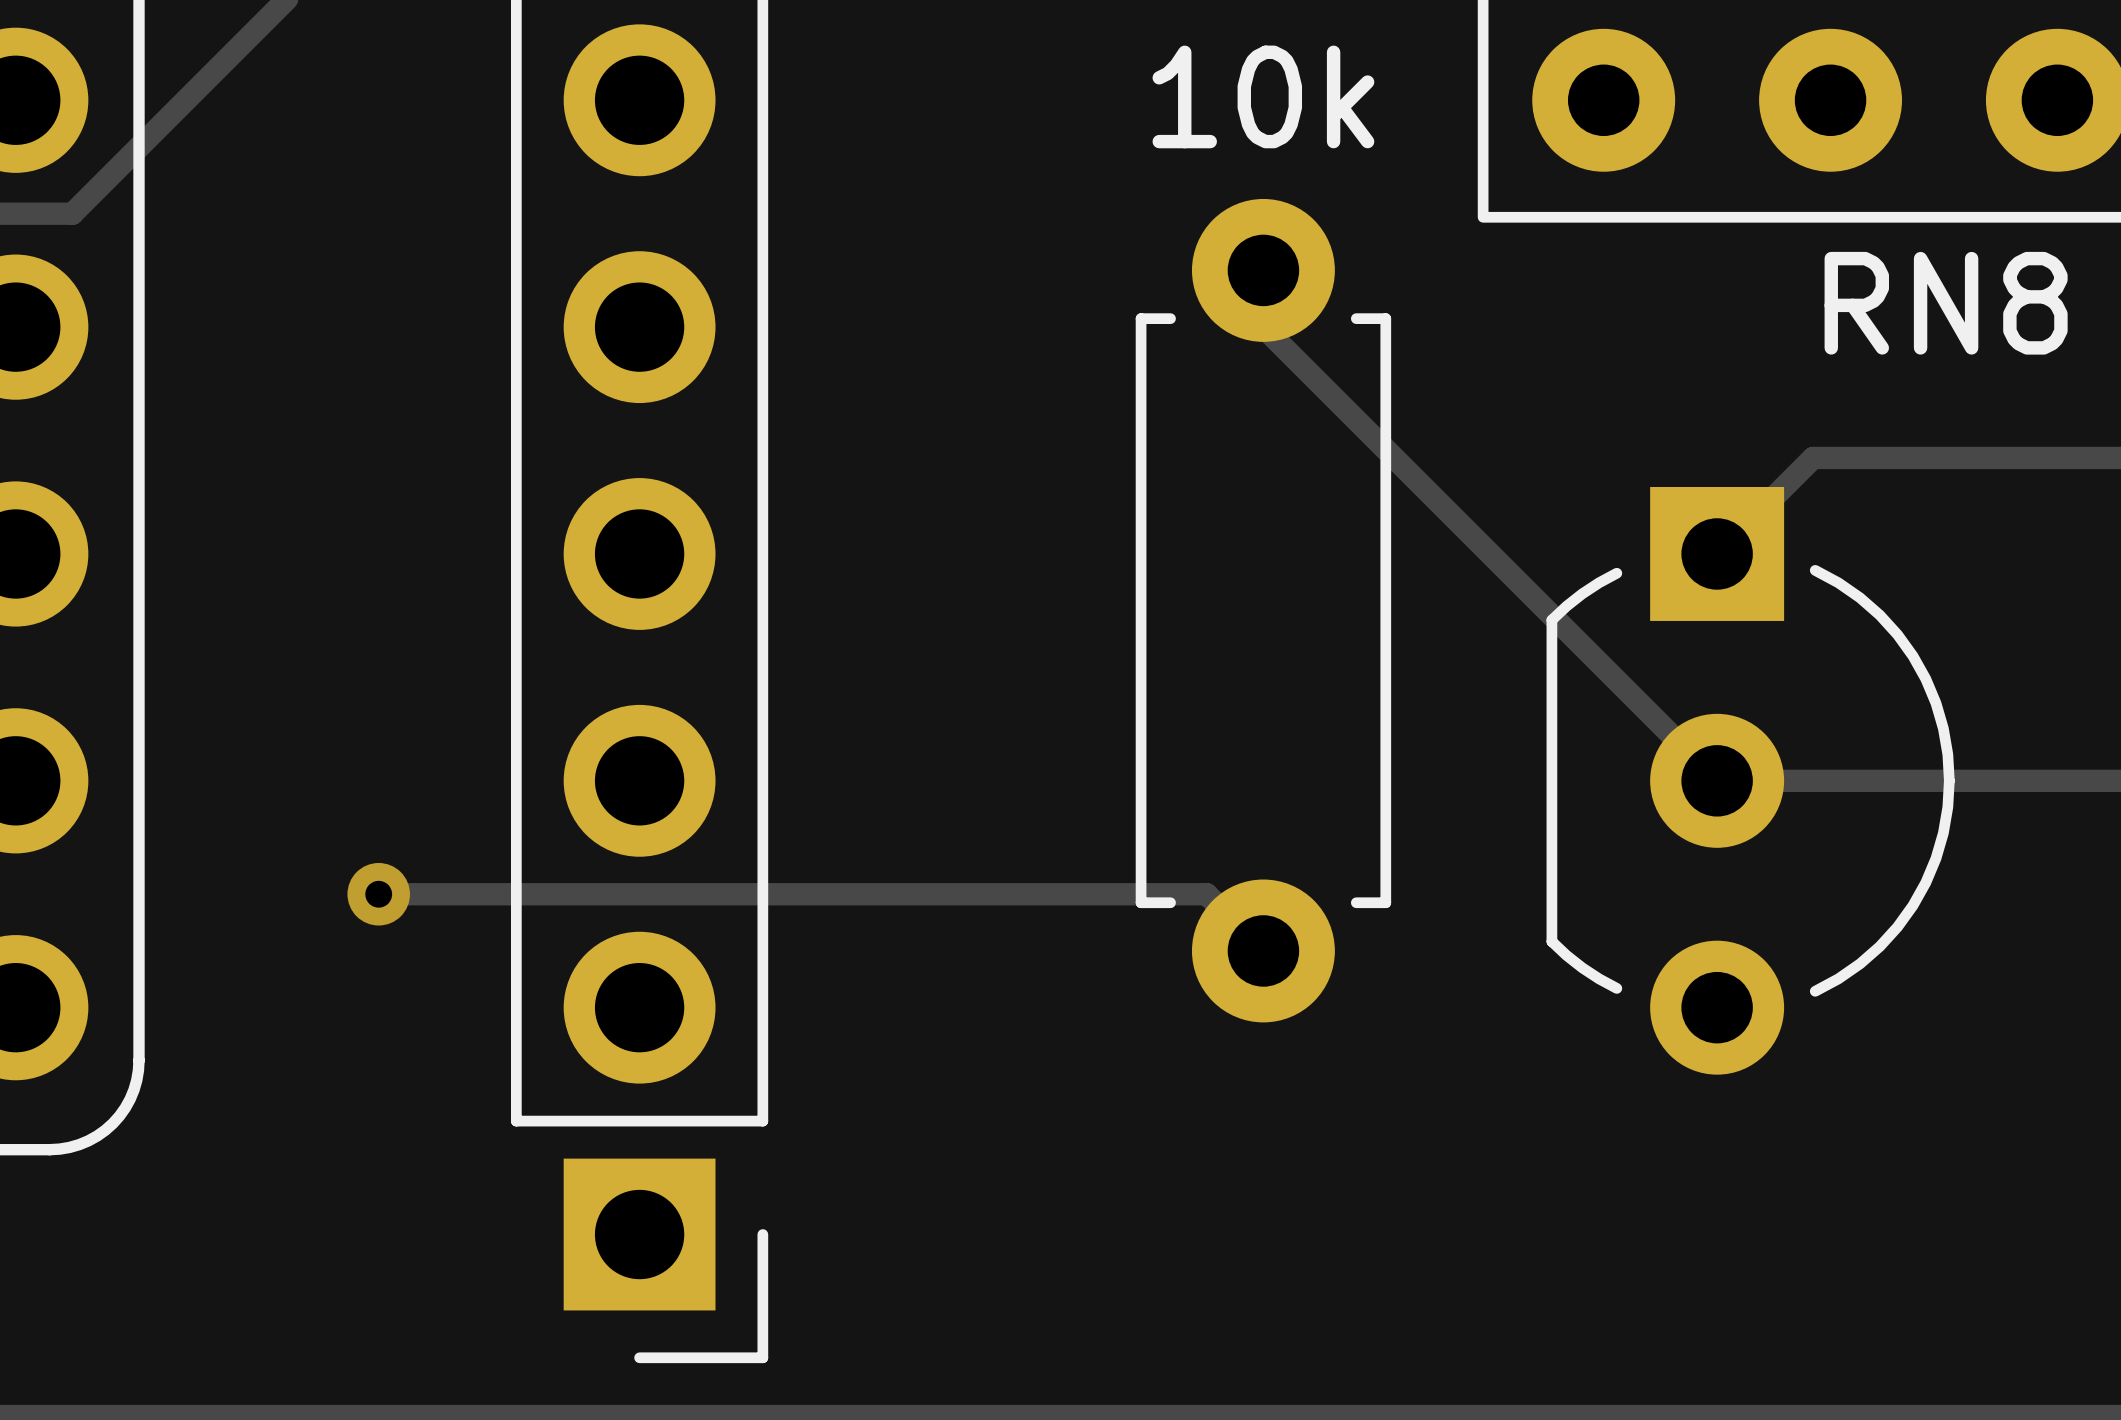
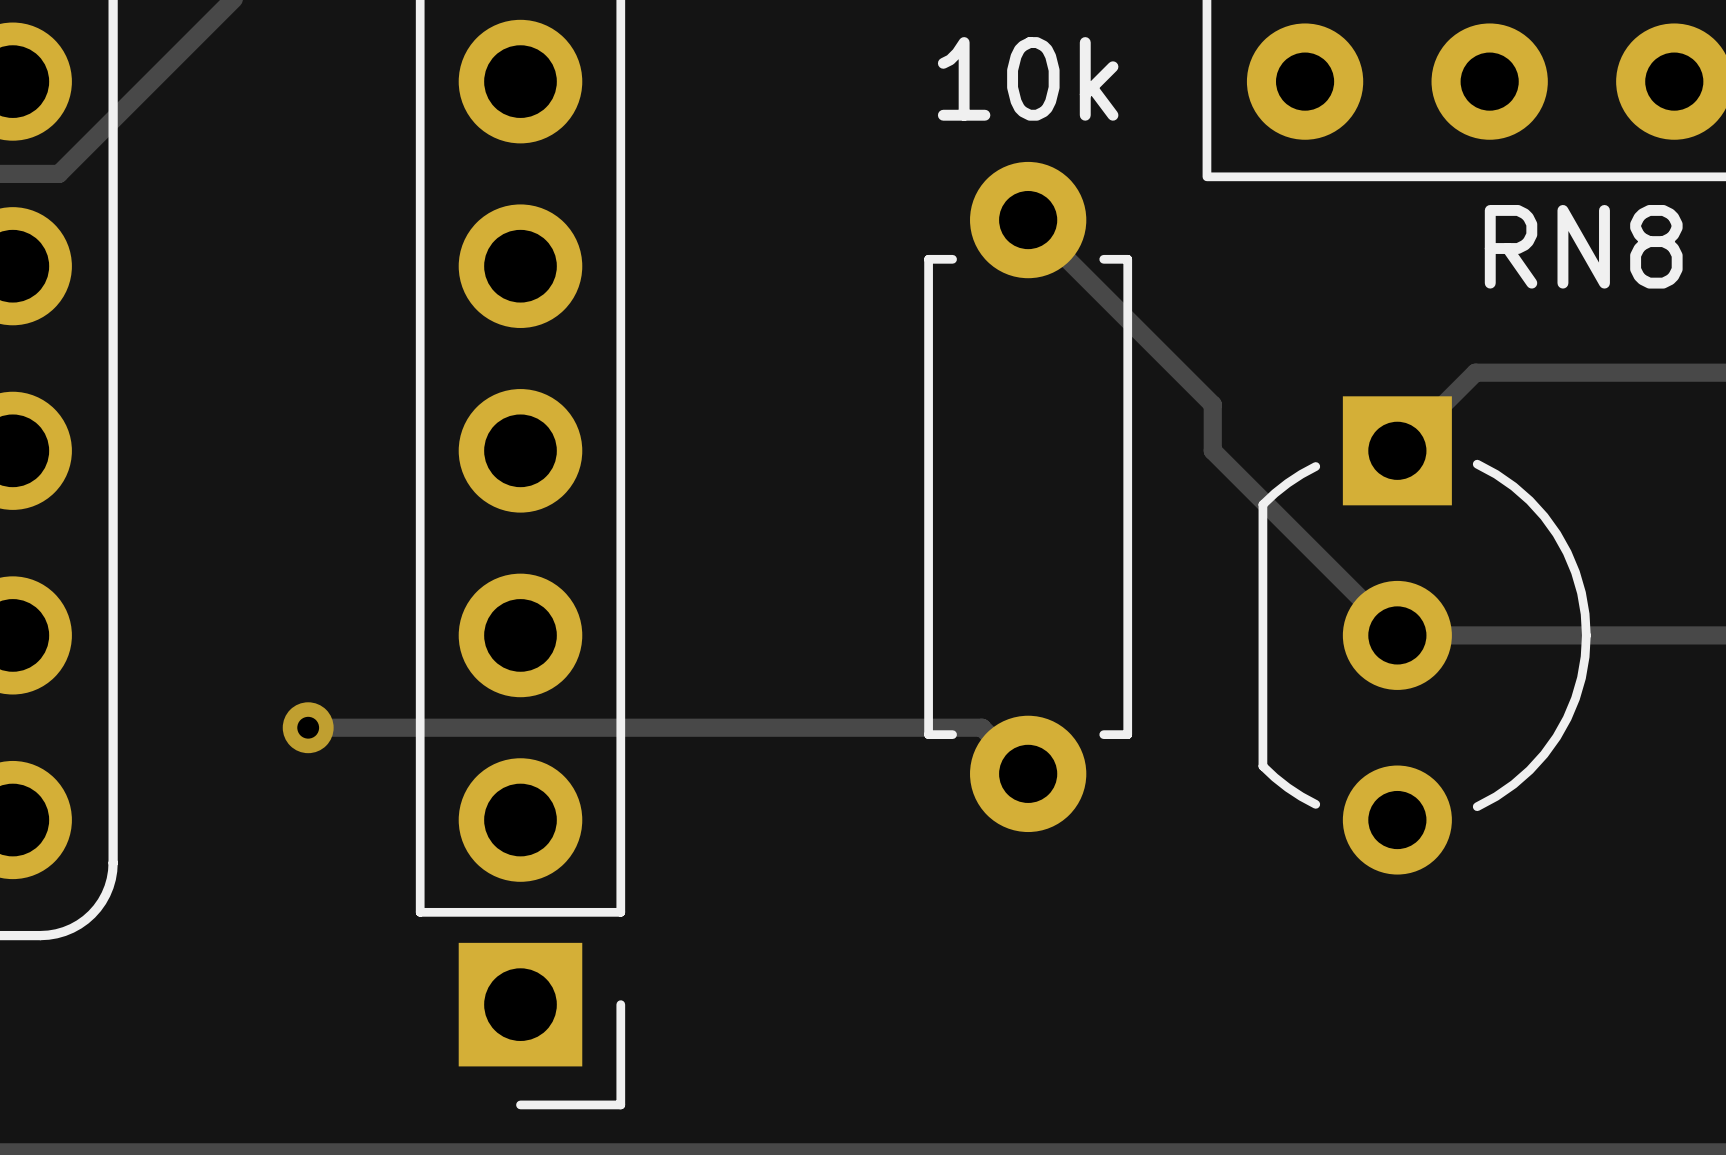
track: (1263, 270) (1263, 327) (1490, 553) -> (1028, 220) (1212, 404) (1212, 450)

